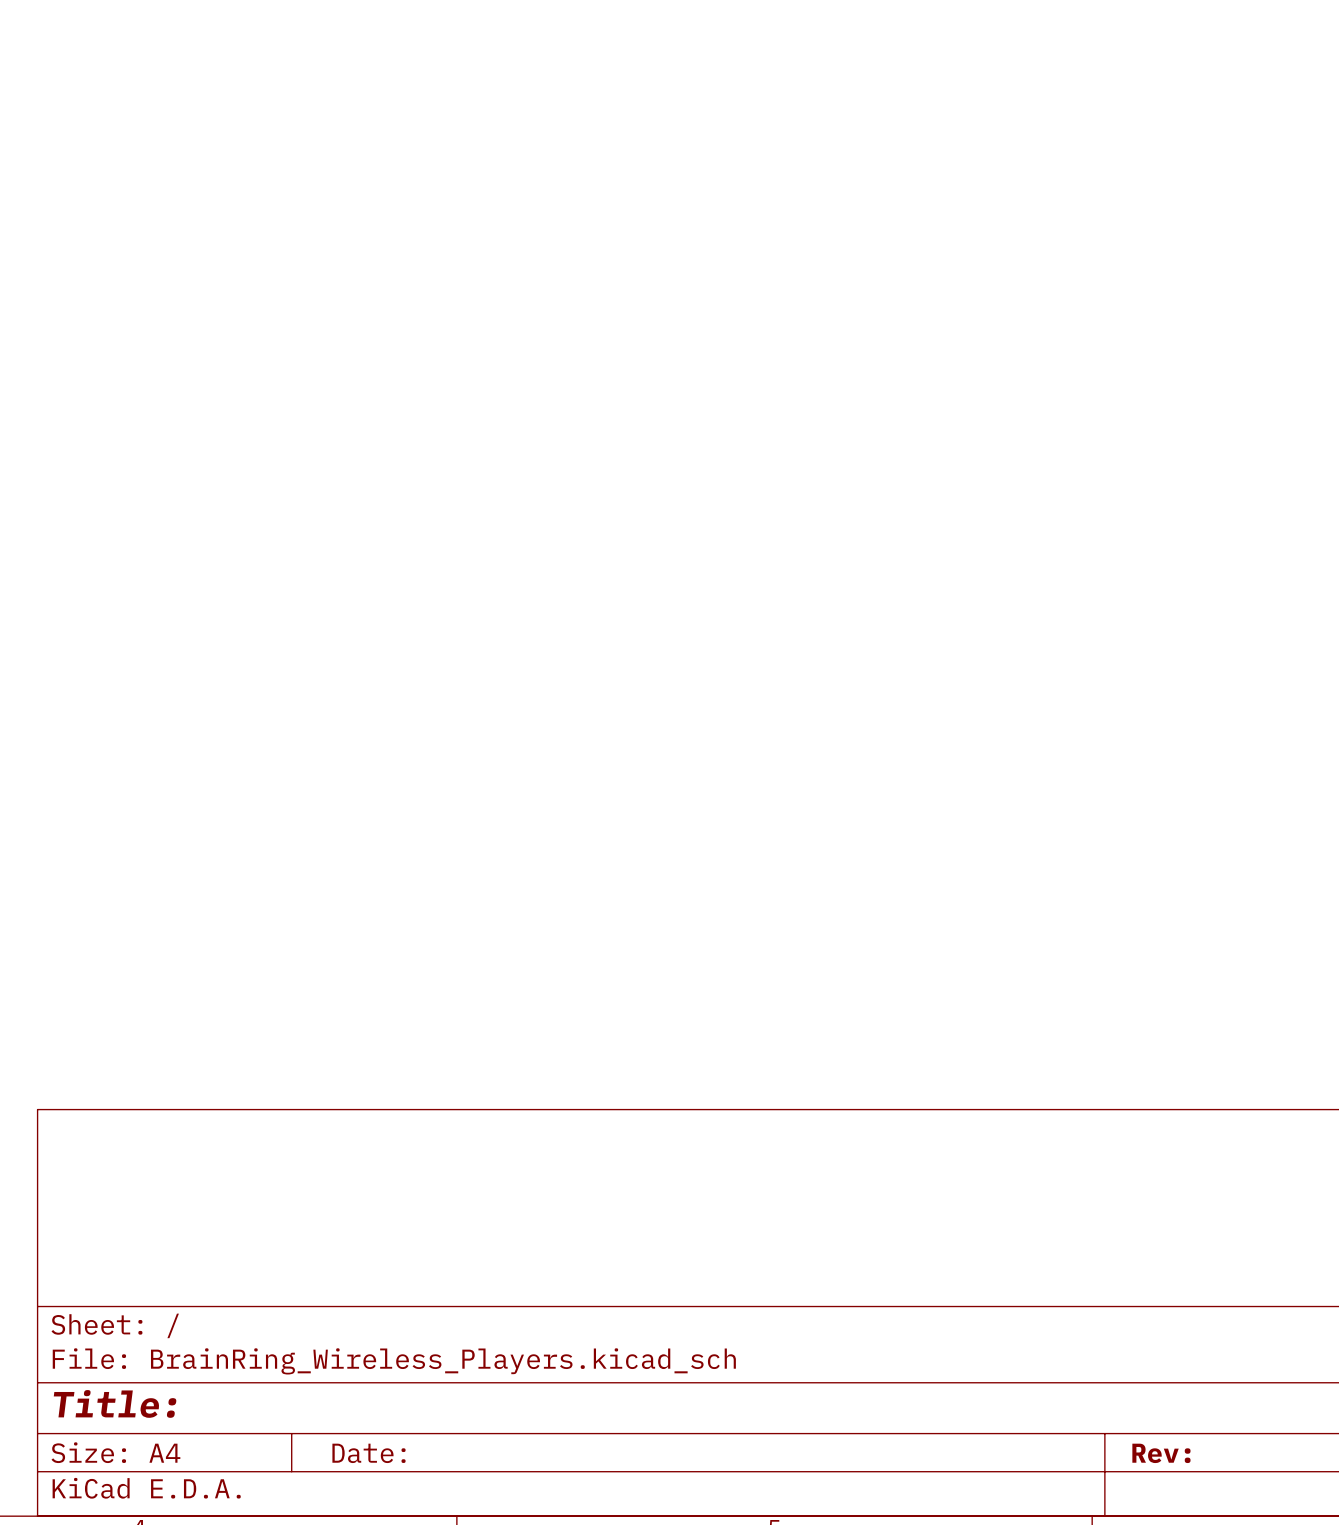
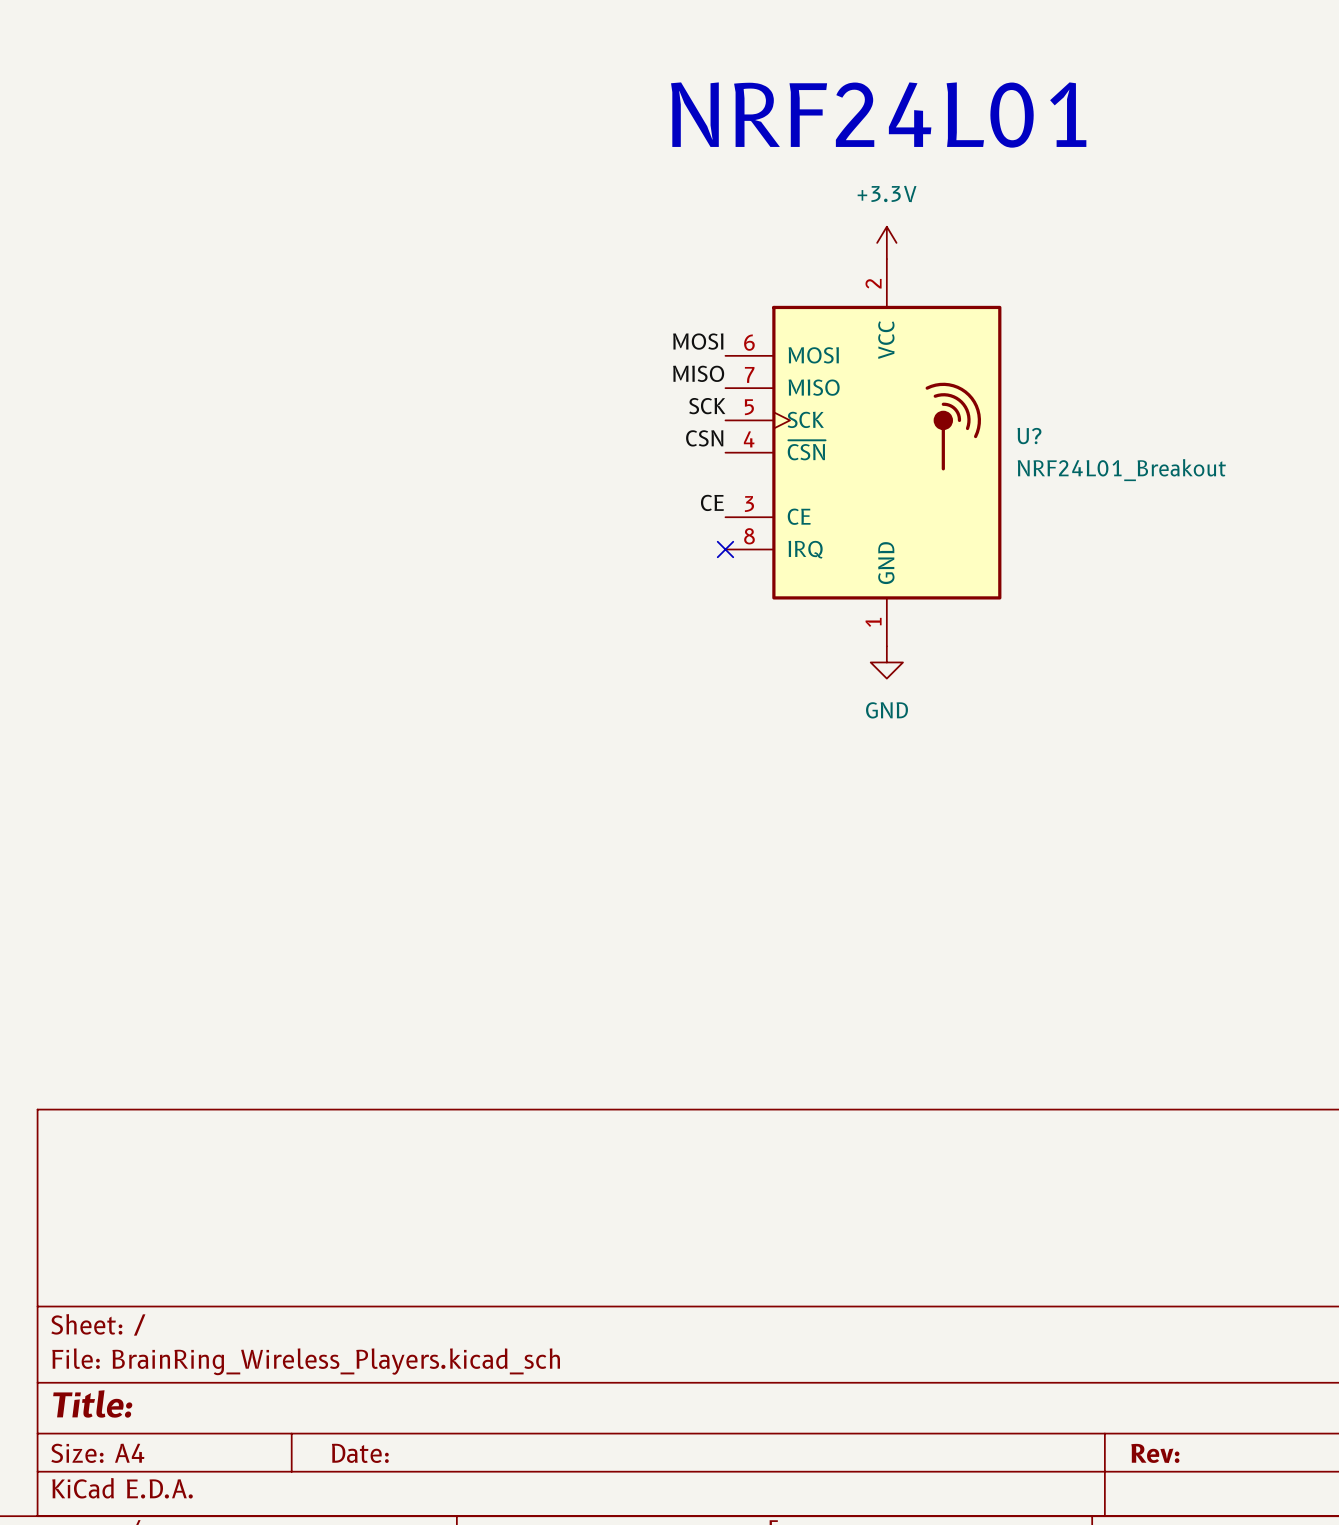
text: none -> NRF24L01 (878, 115)
power symbol: none -> +3.3V (886, 242)
label: none -> MOSI (698, 341)
label: none -> MISO (698, 373)
label: none -> SCK (707, 406)
label: none -> CSN (704, 438)
U?: none -> NRF24L01_Breakout (863, 452)
label: none -> CE (712, 502)
no-connect mark: none -> (725, 549)
power symbol: none -> GND (886, 662)

